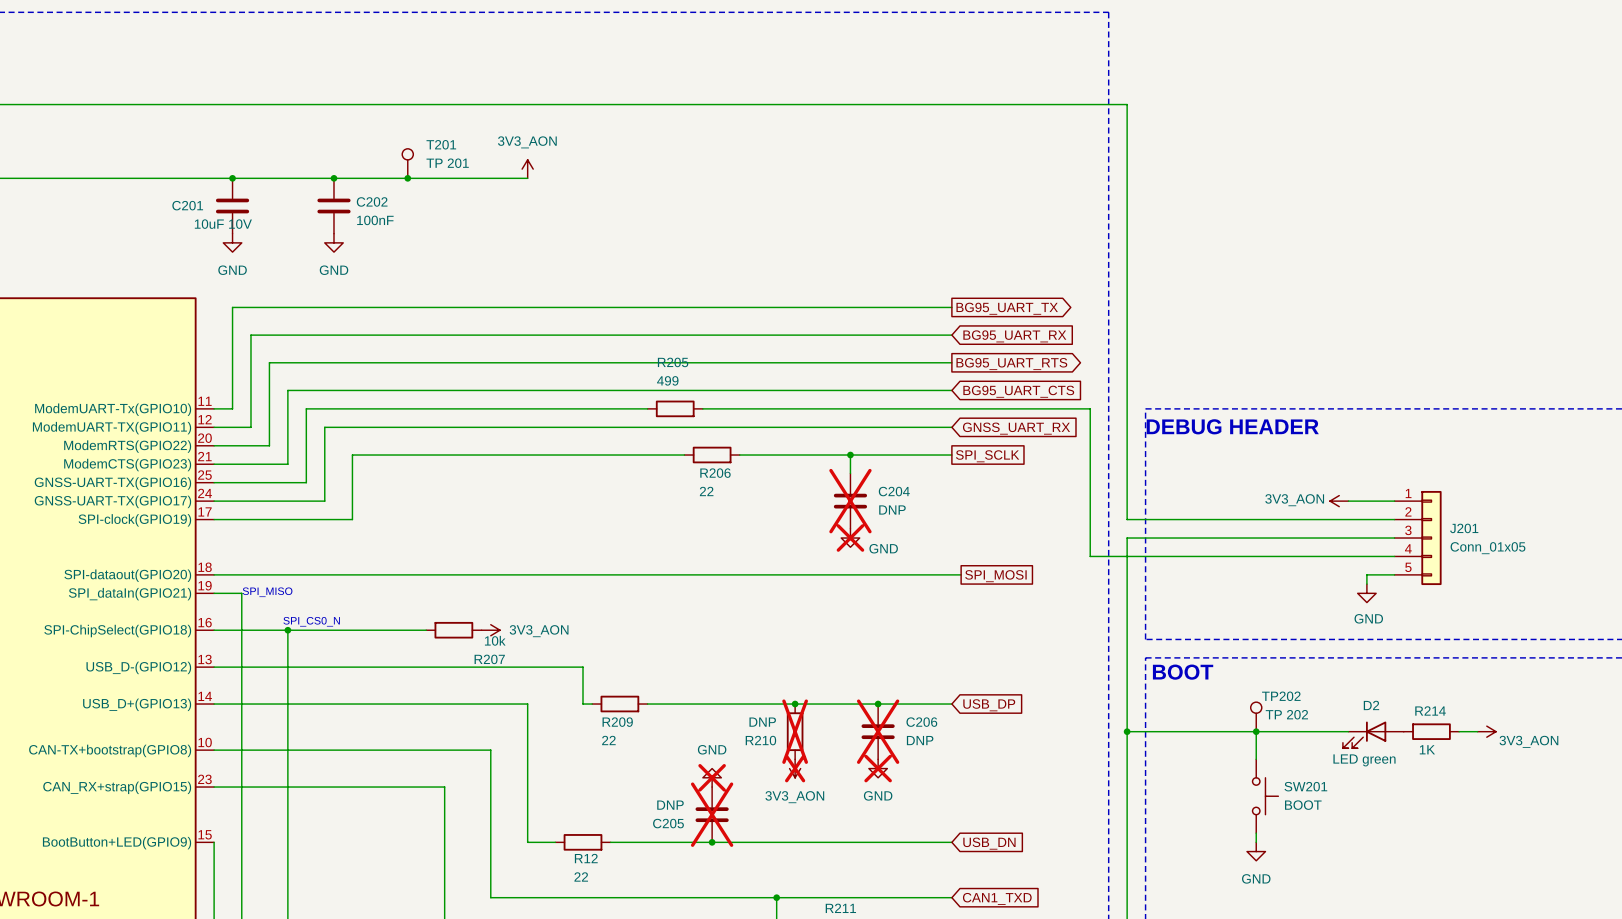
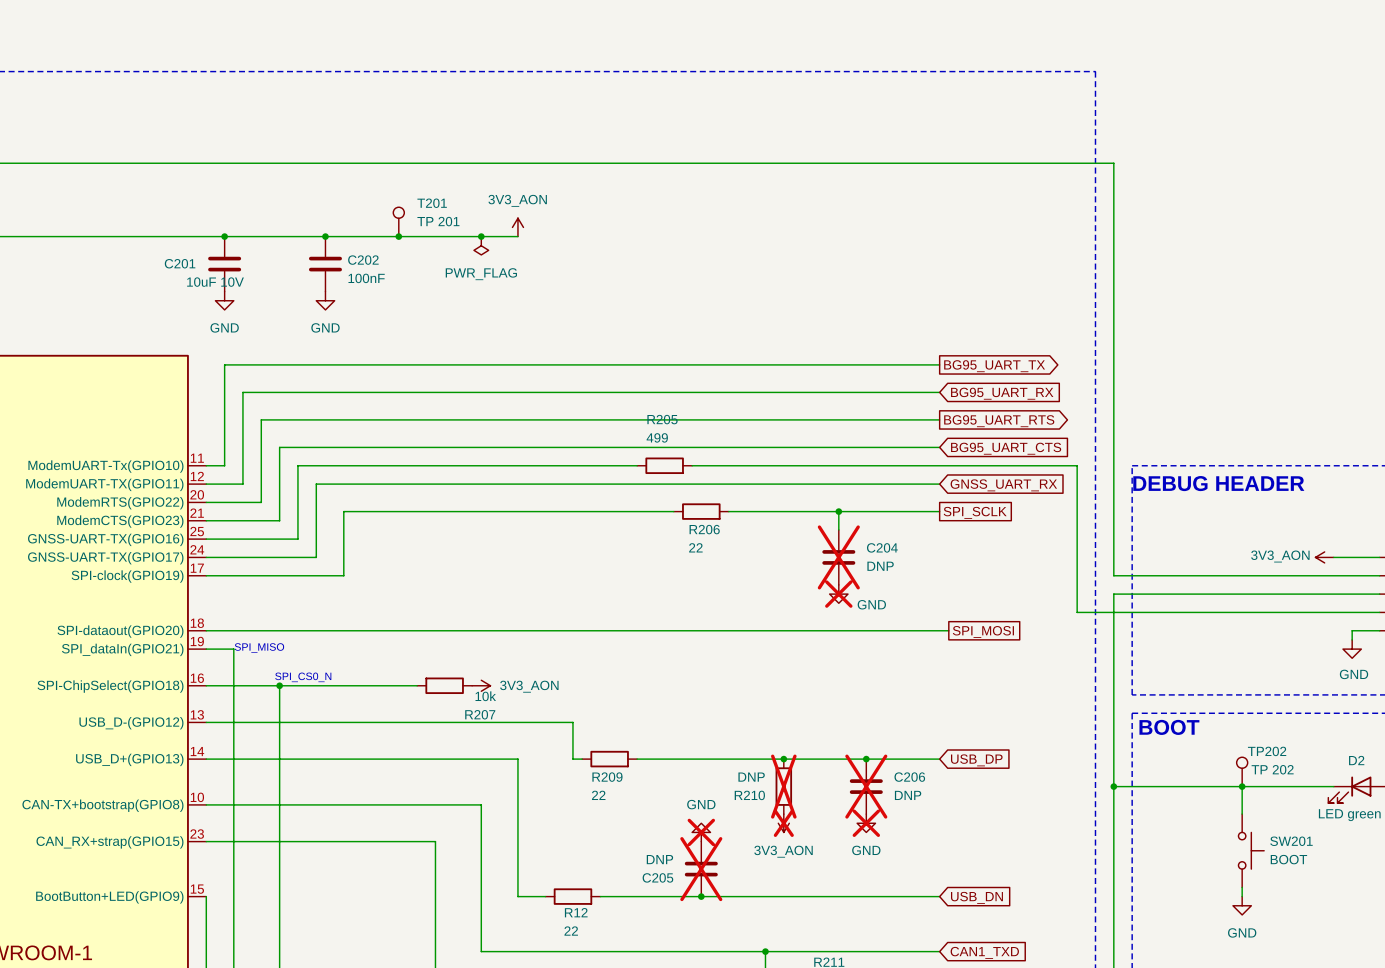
junction: none -> (481, 236)
power symbol: none -> PWR_FLAG (481, 245)

